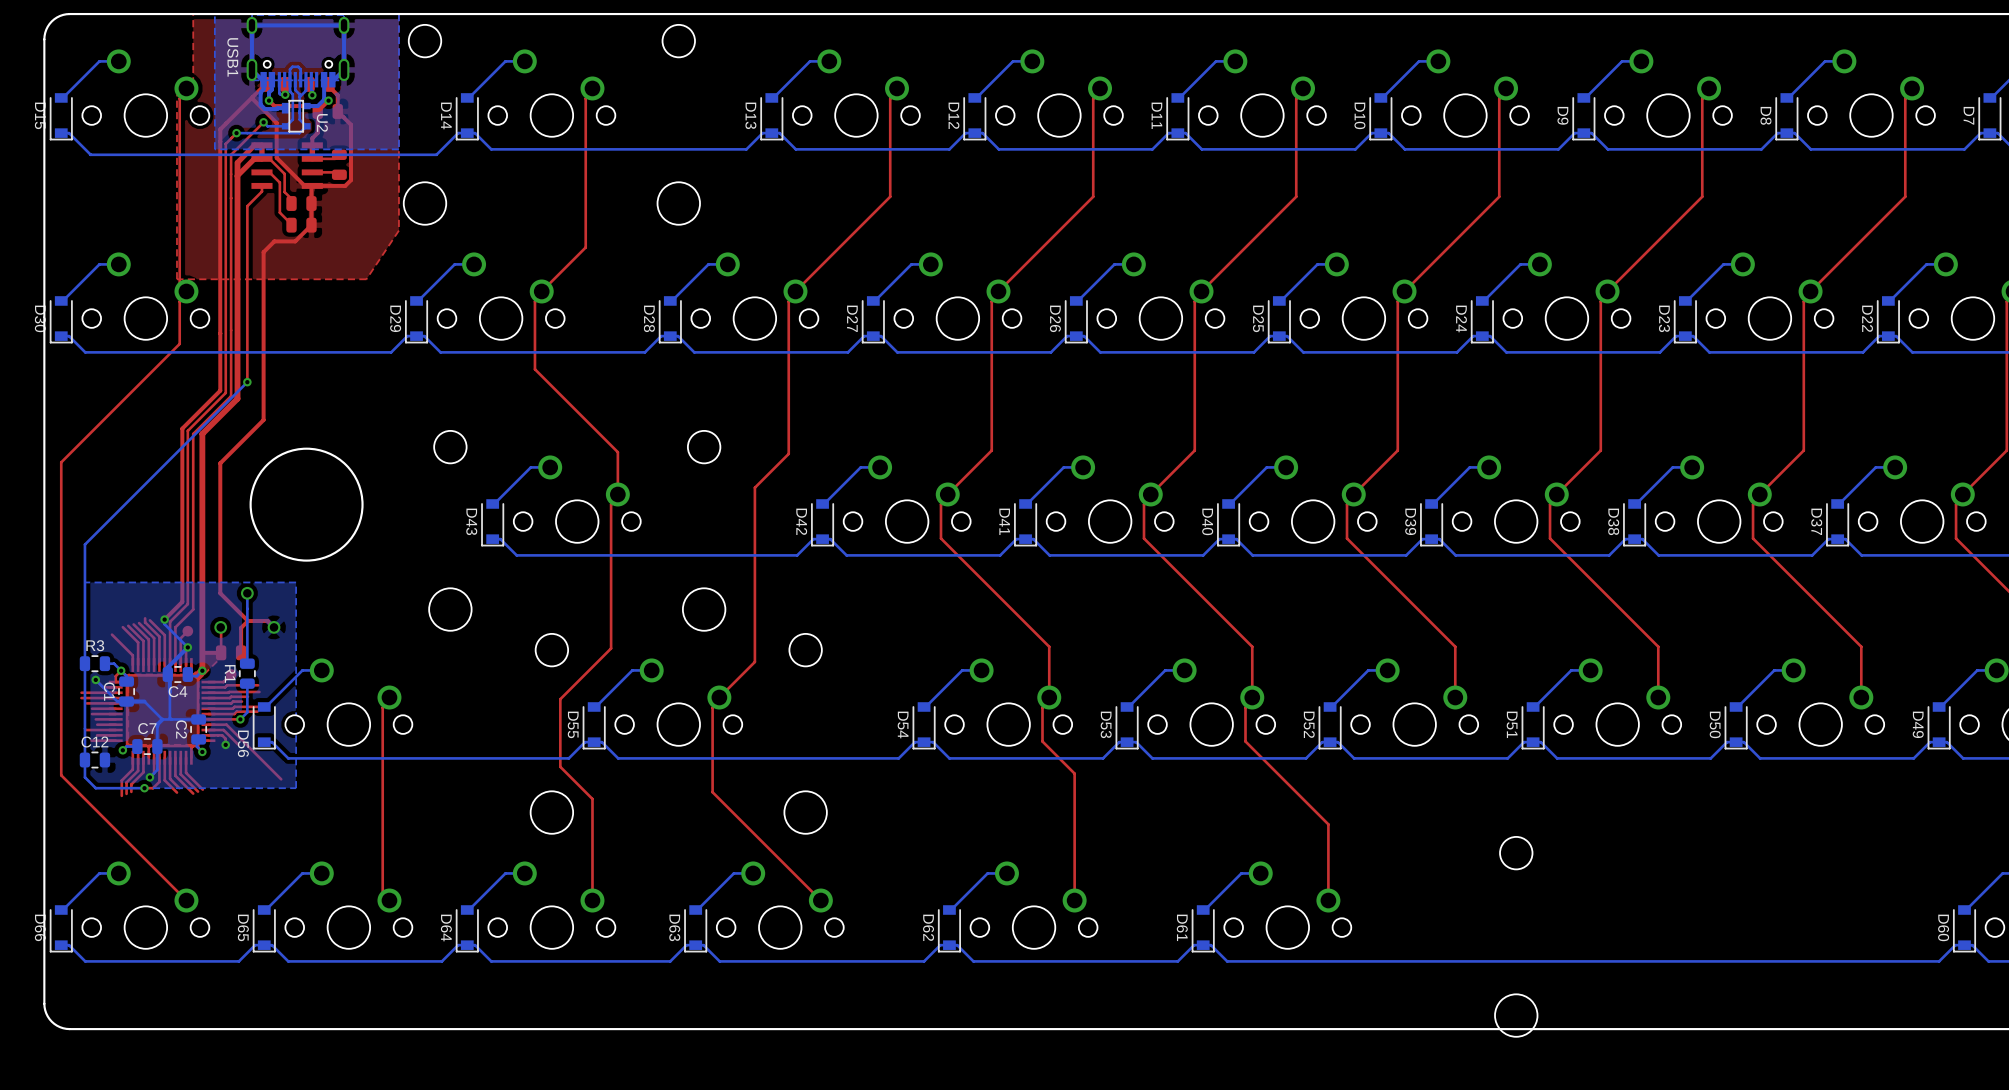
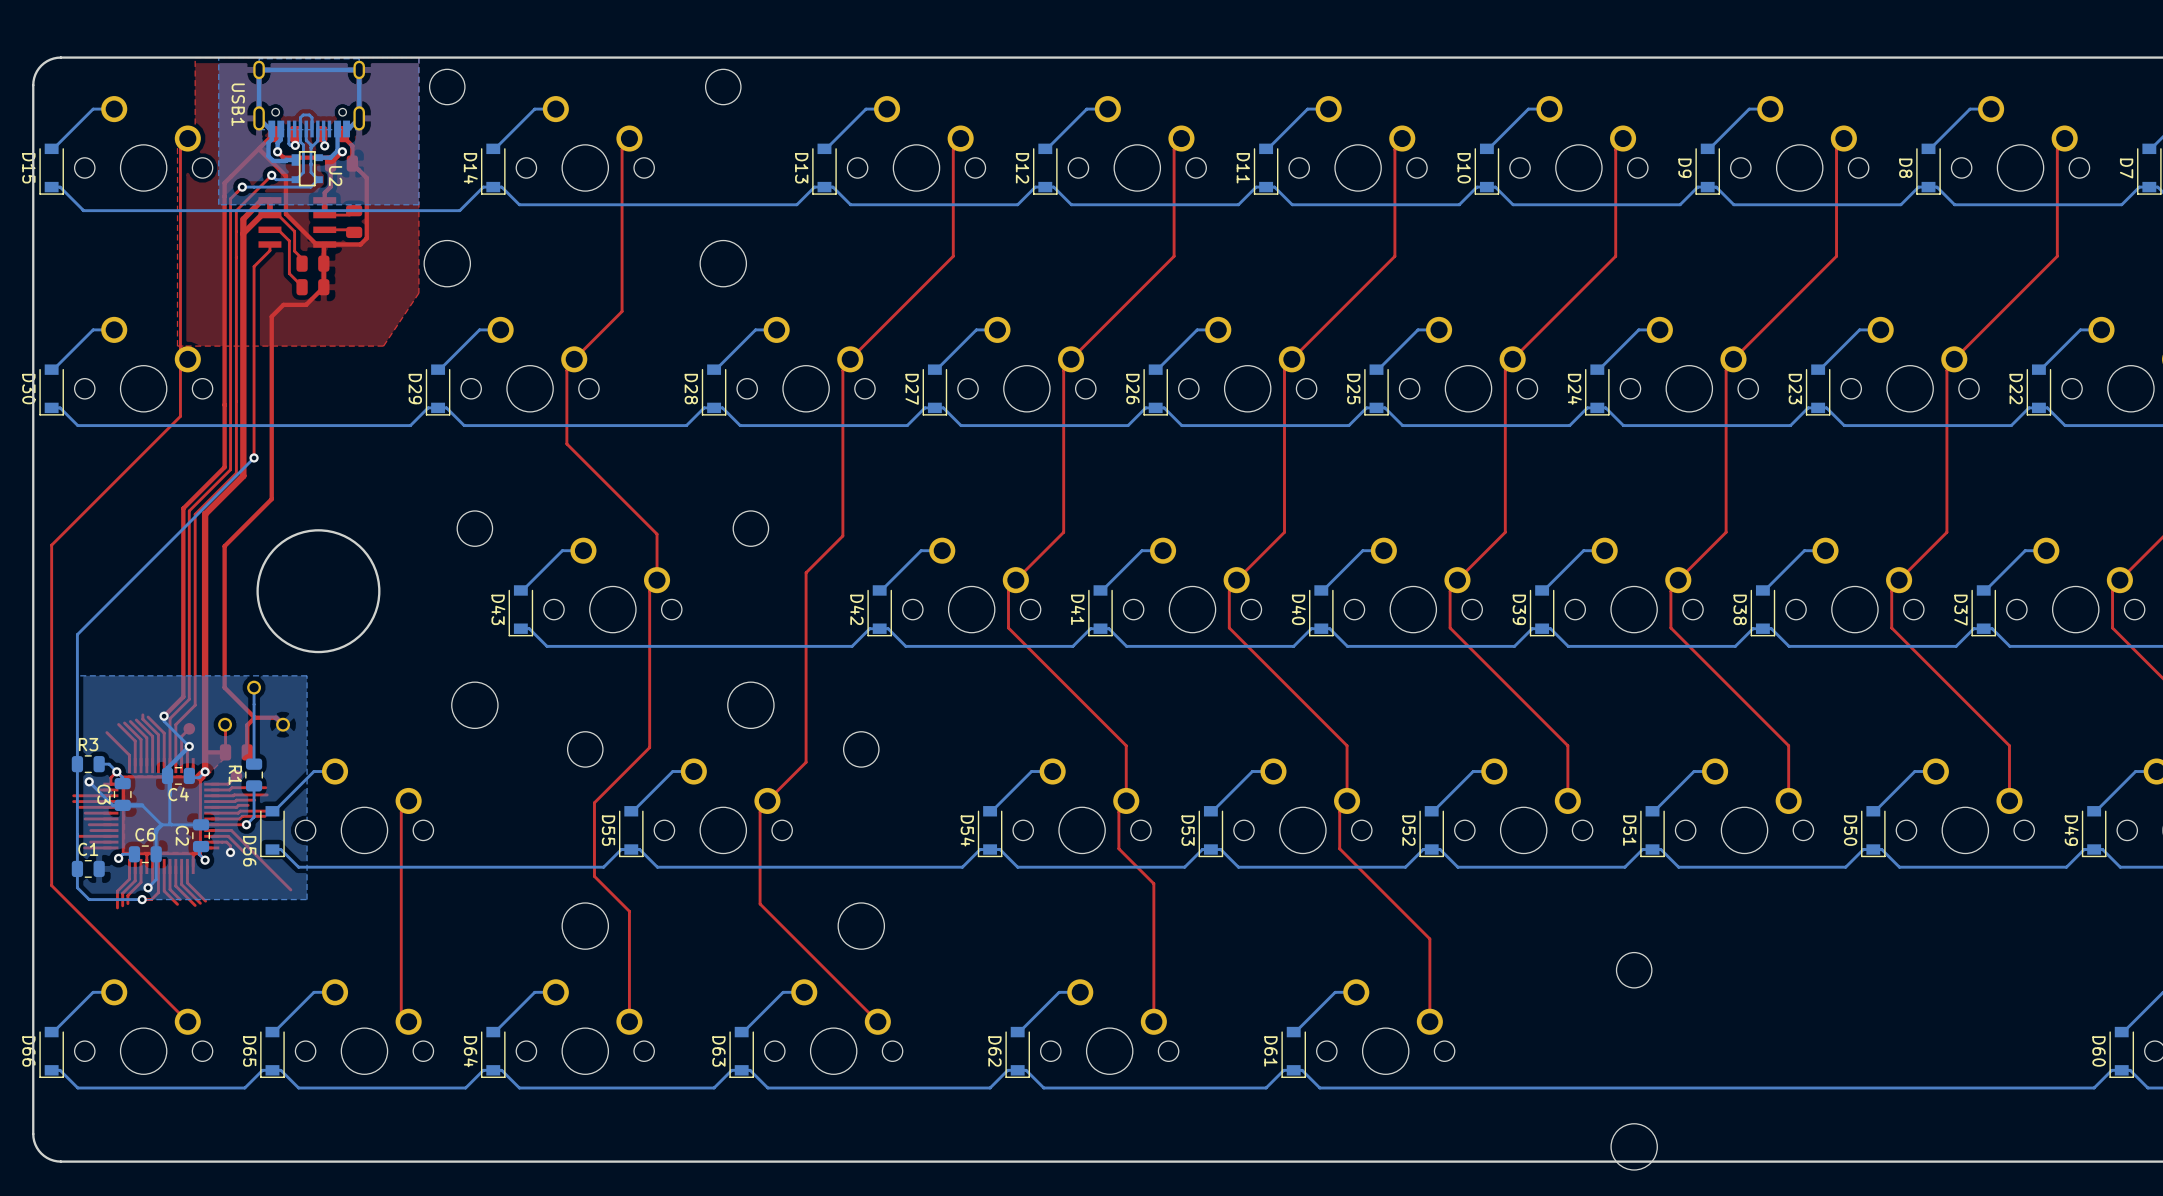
C1 name: C1 (109, 691) -> C3 (103, 794)
C7 name: C7 (147, 728) -> C6 (145, 834)
C12 name: C12 (94, 742) -> C1 (88, 849)

